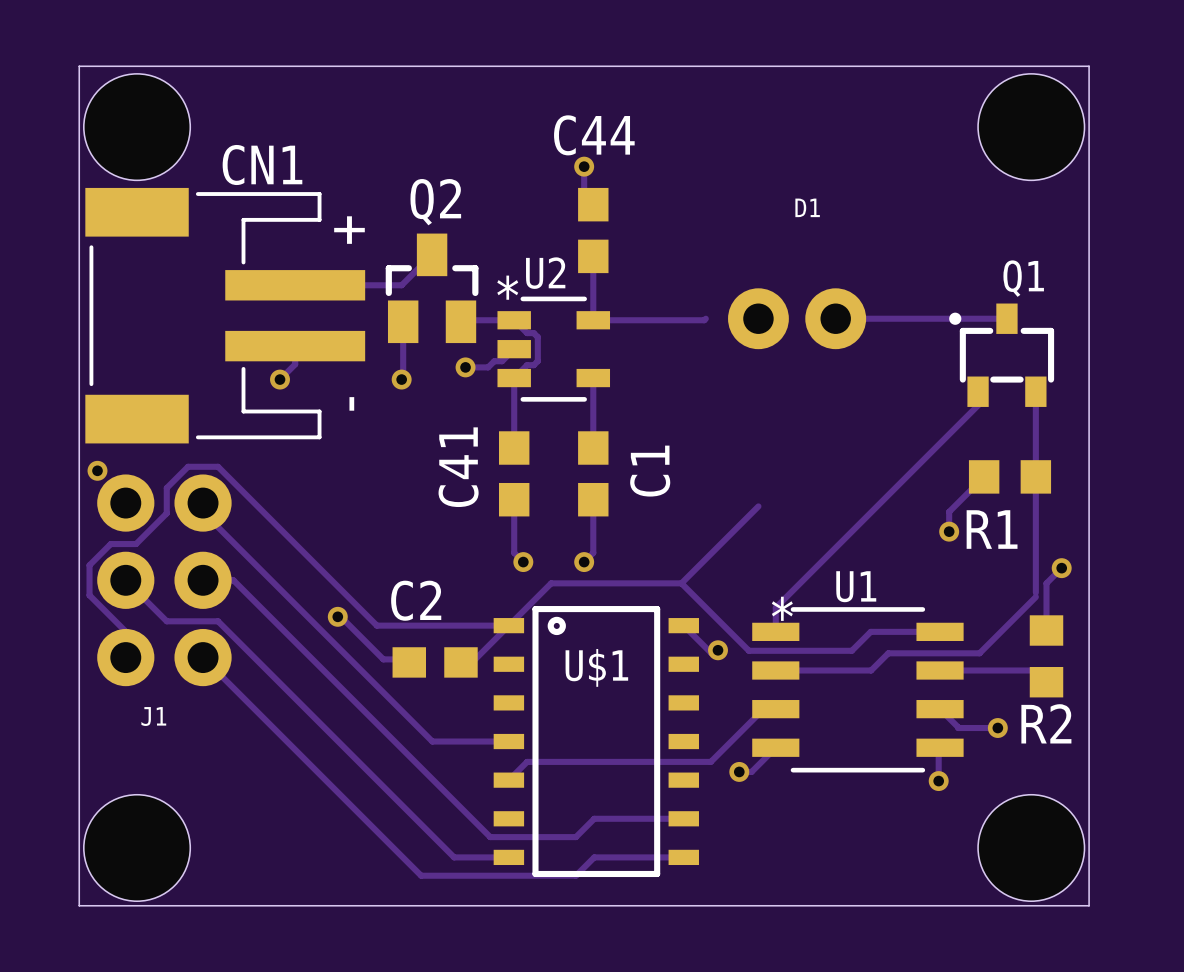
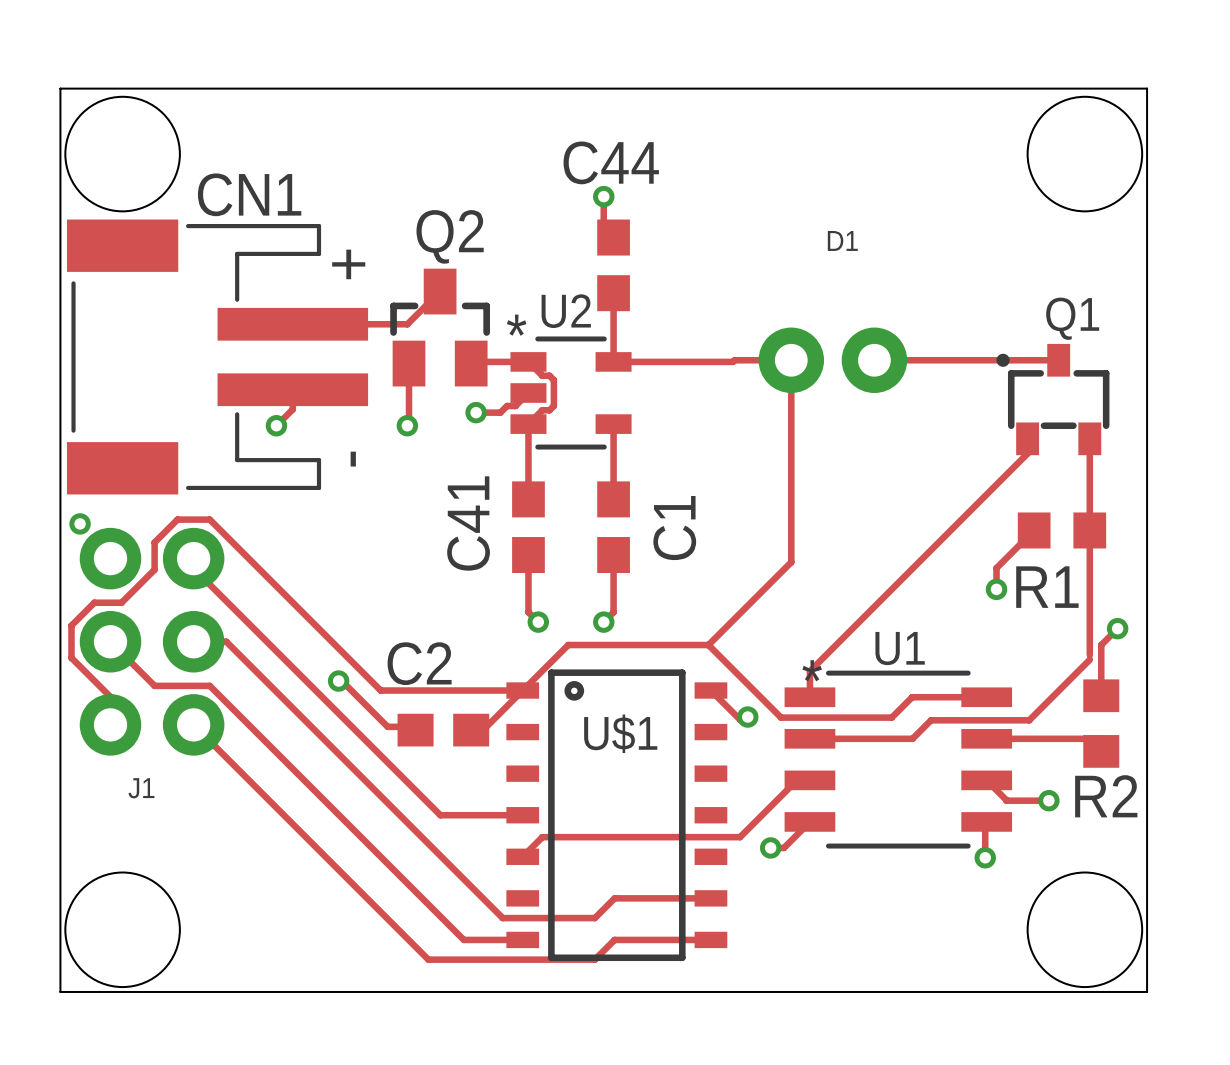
track: none -> (734, 360) (791, 360) (791, 562)

